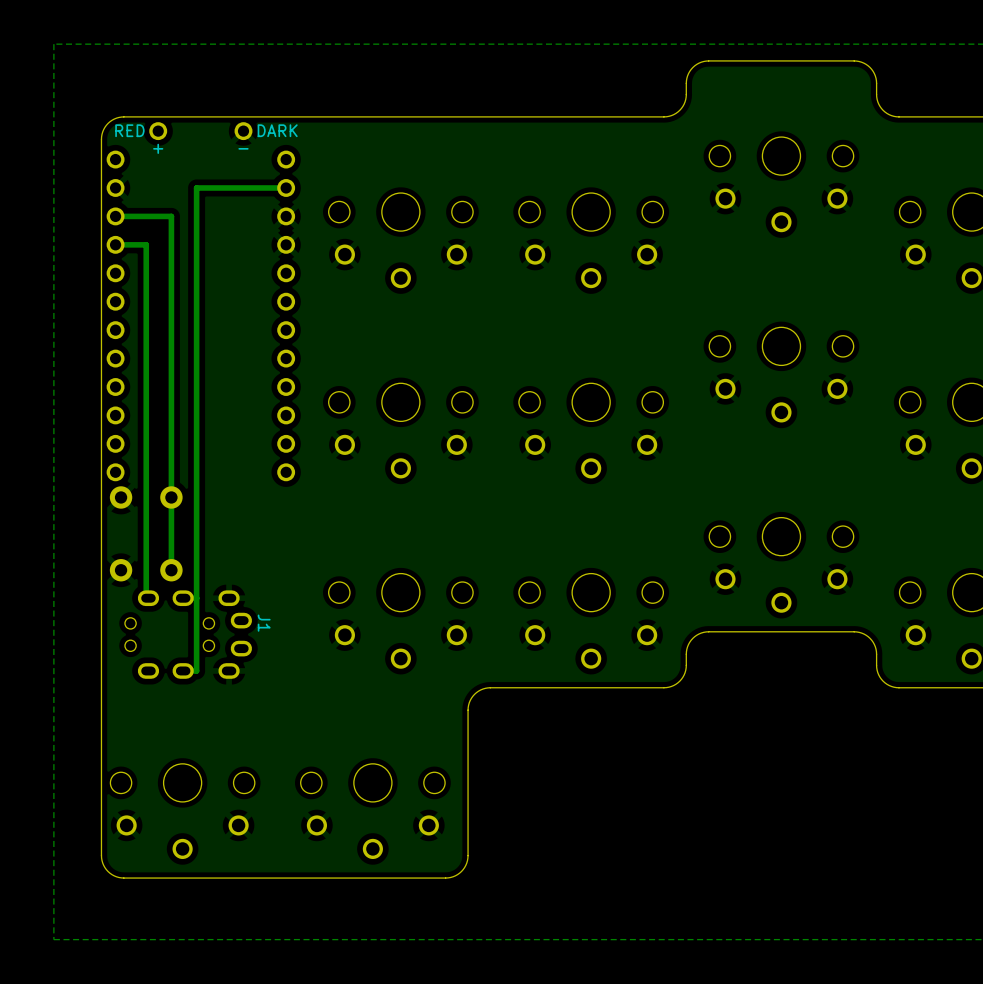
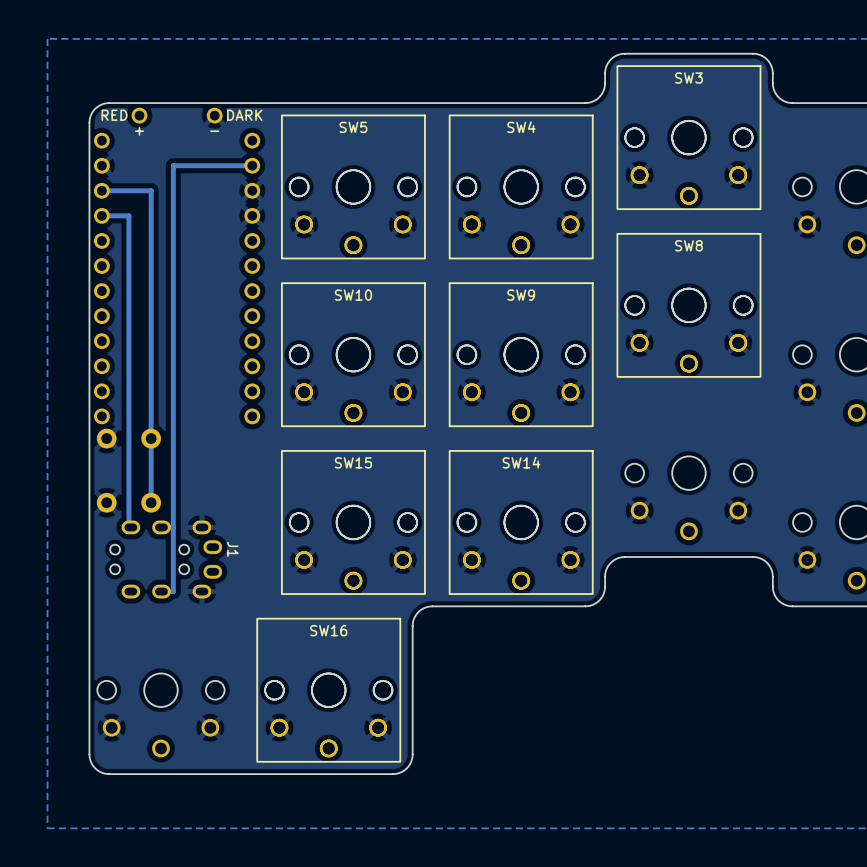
SW3: none -> (688, 137)
SW5: none -> (353, 186)
SW4: none -> (521, 186)
SW8: none -> (688, 305)
SW10: none -> (353, 354)
SW9: none -> (521, 354)
SW15: none -> (353, 522)
SW14: none -> (521, 522)
SW16: none -> (328, 690)

